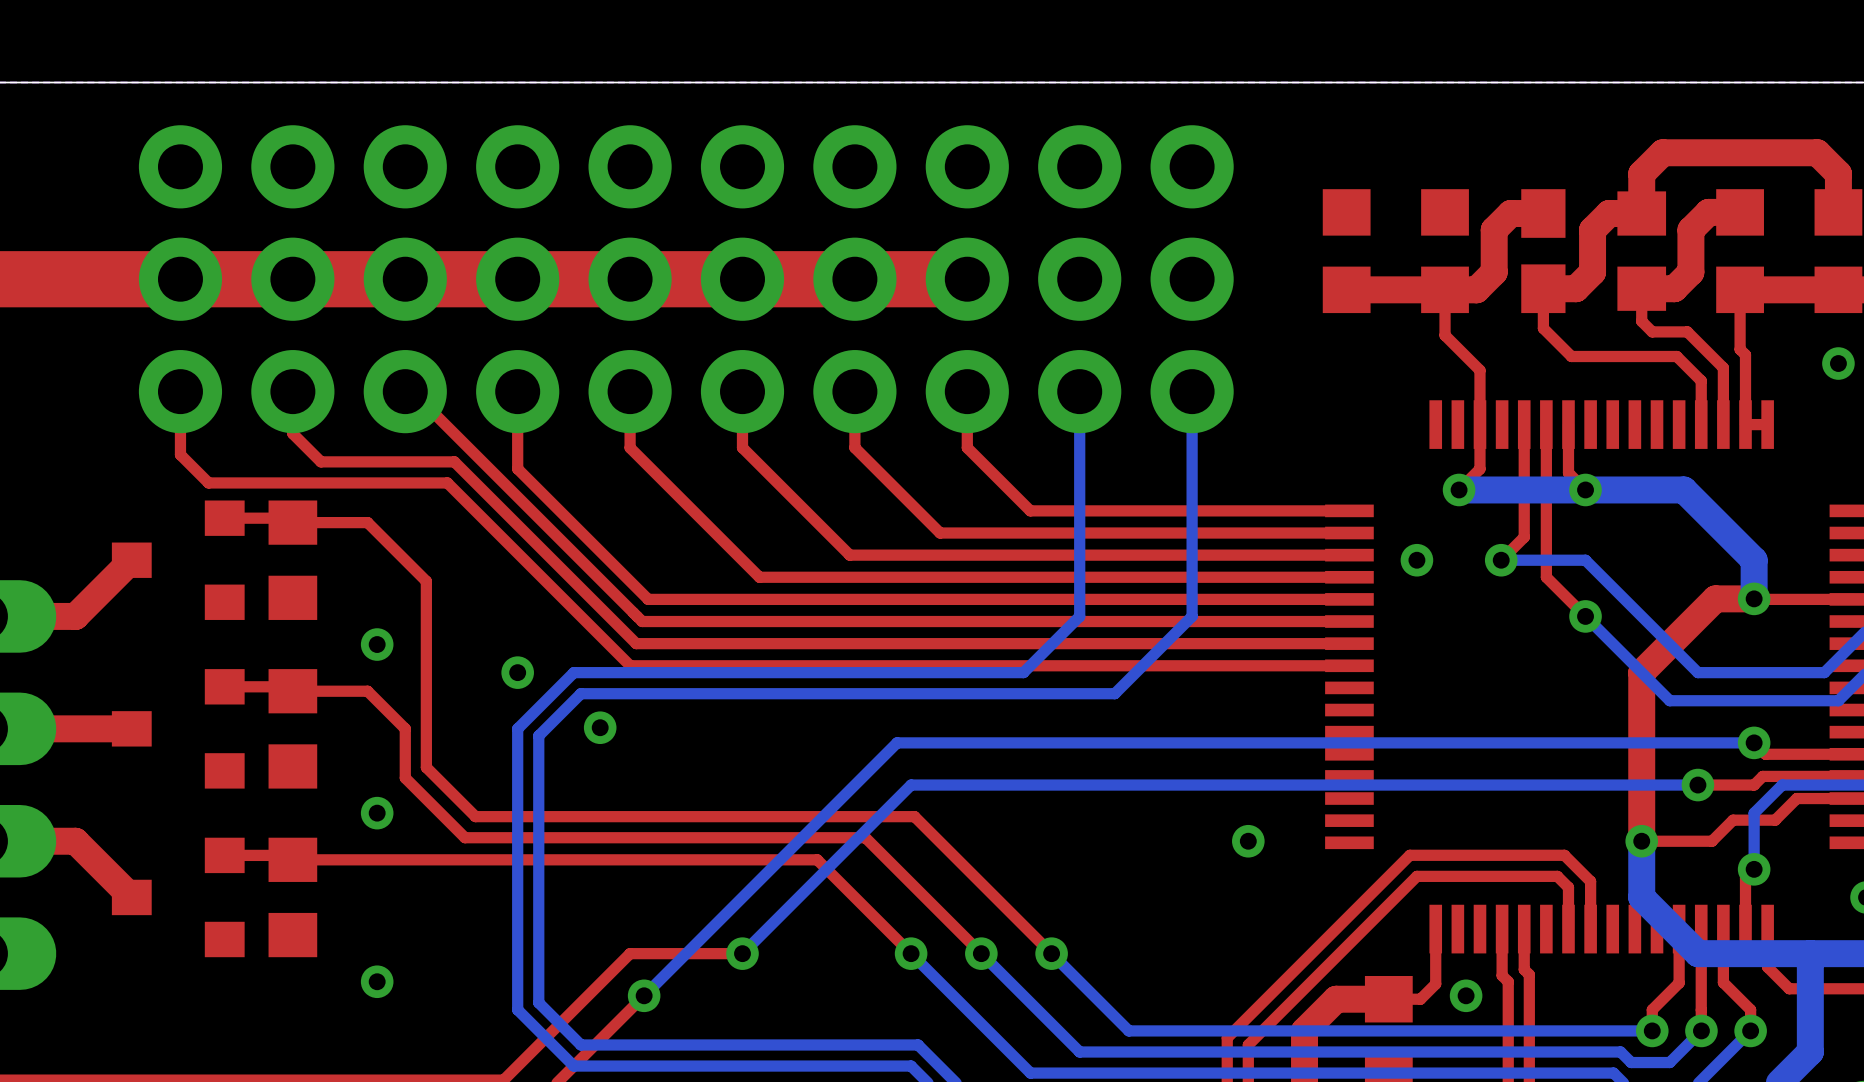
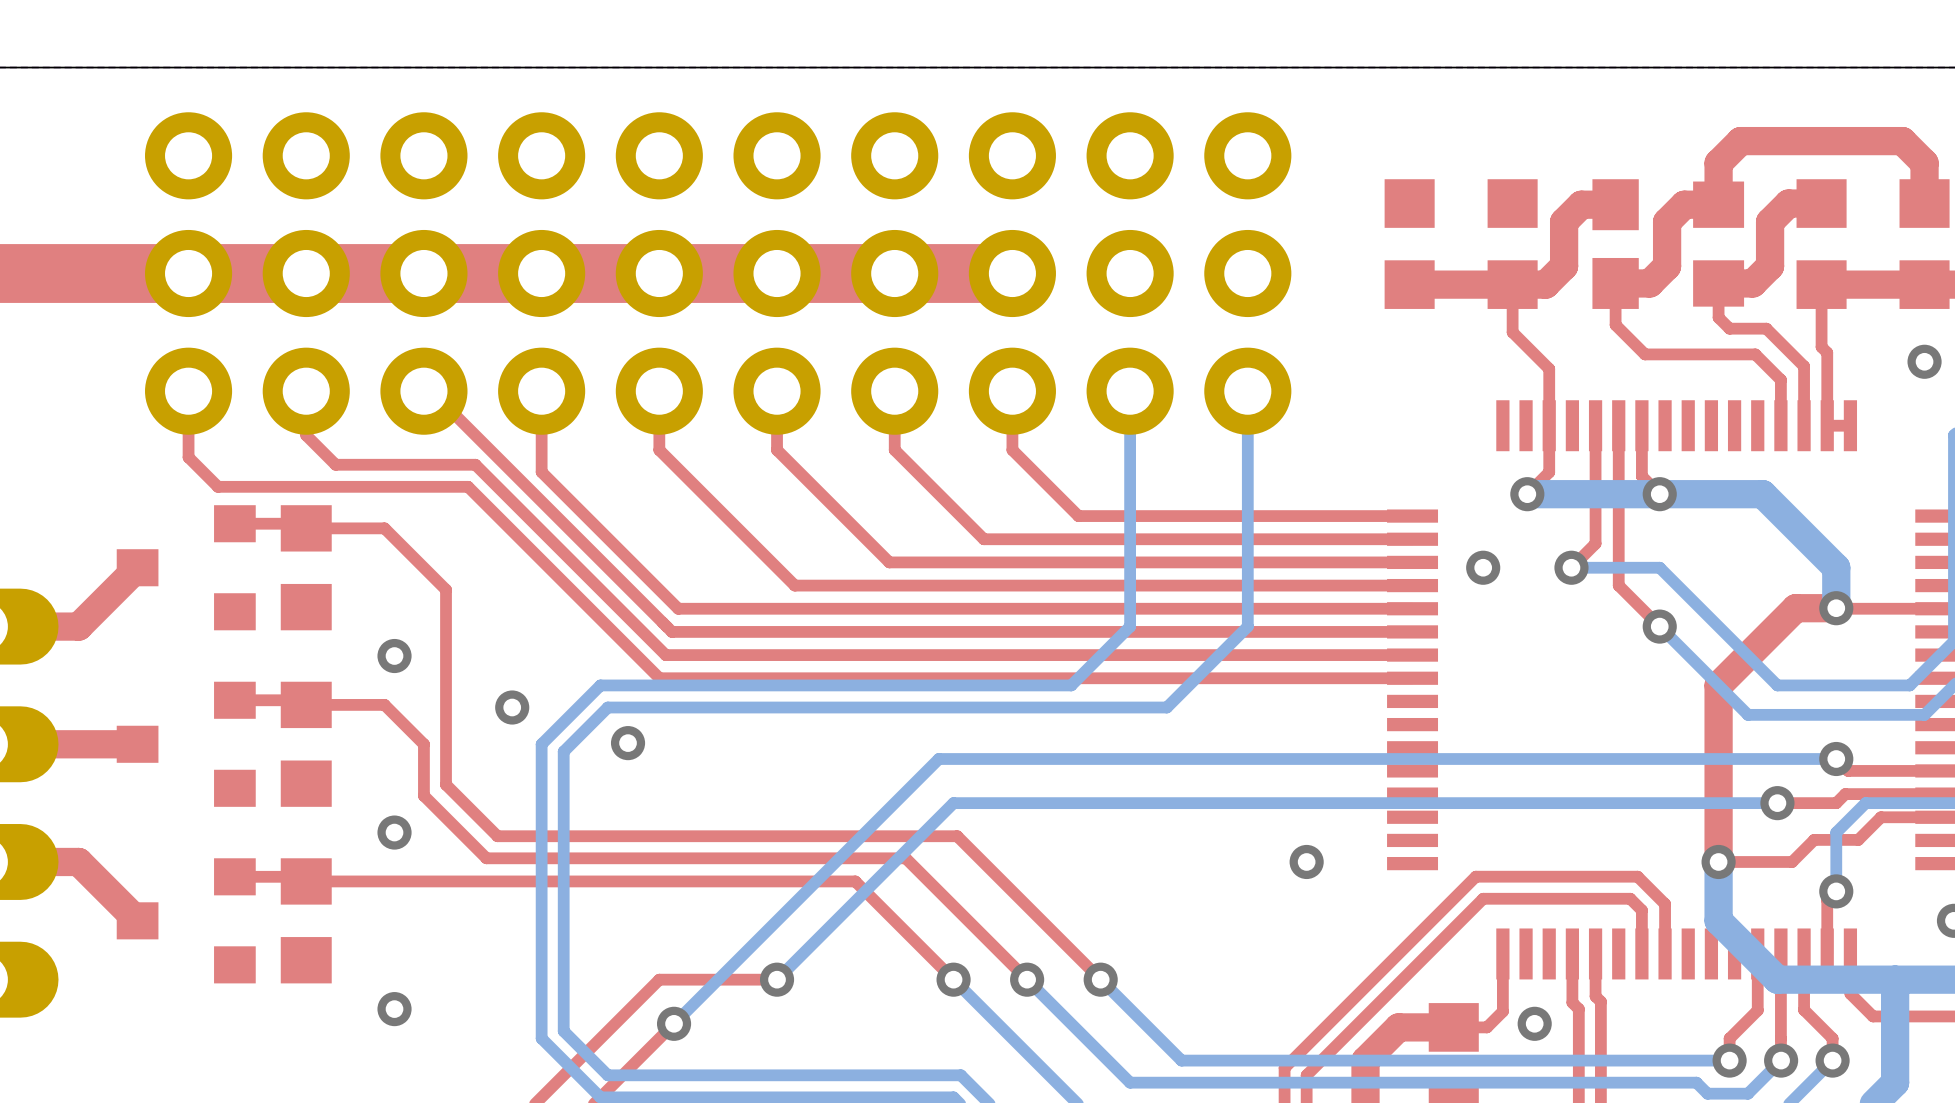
via position: (517, 672) -> (512, 707)

